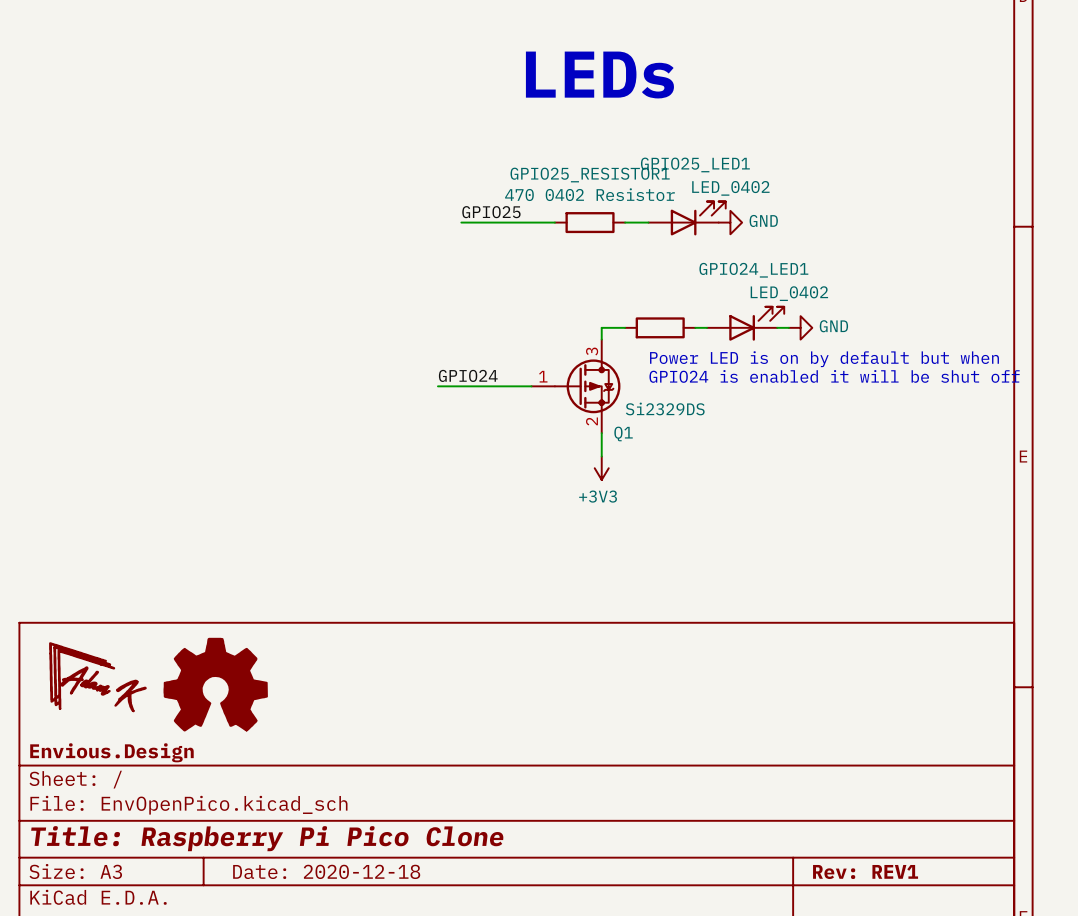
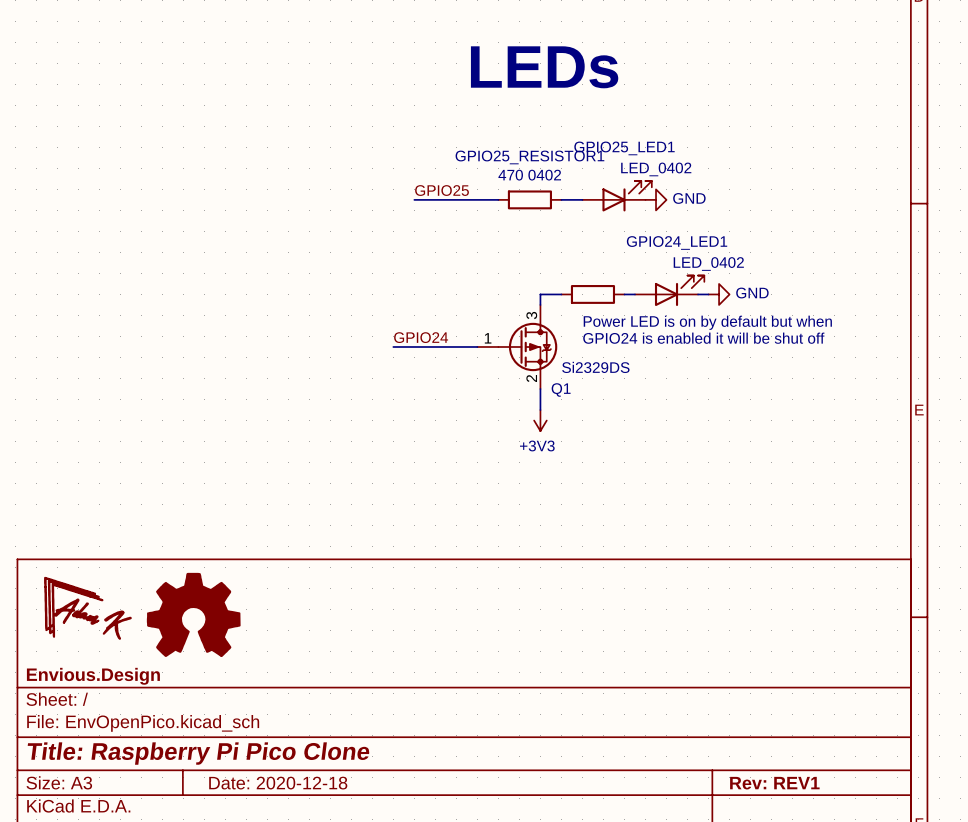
GPIO25_RESISTOR1 value: 470 0402 Resistor (589, 194) -> 470 0402 (529, 175)

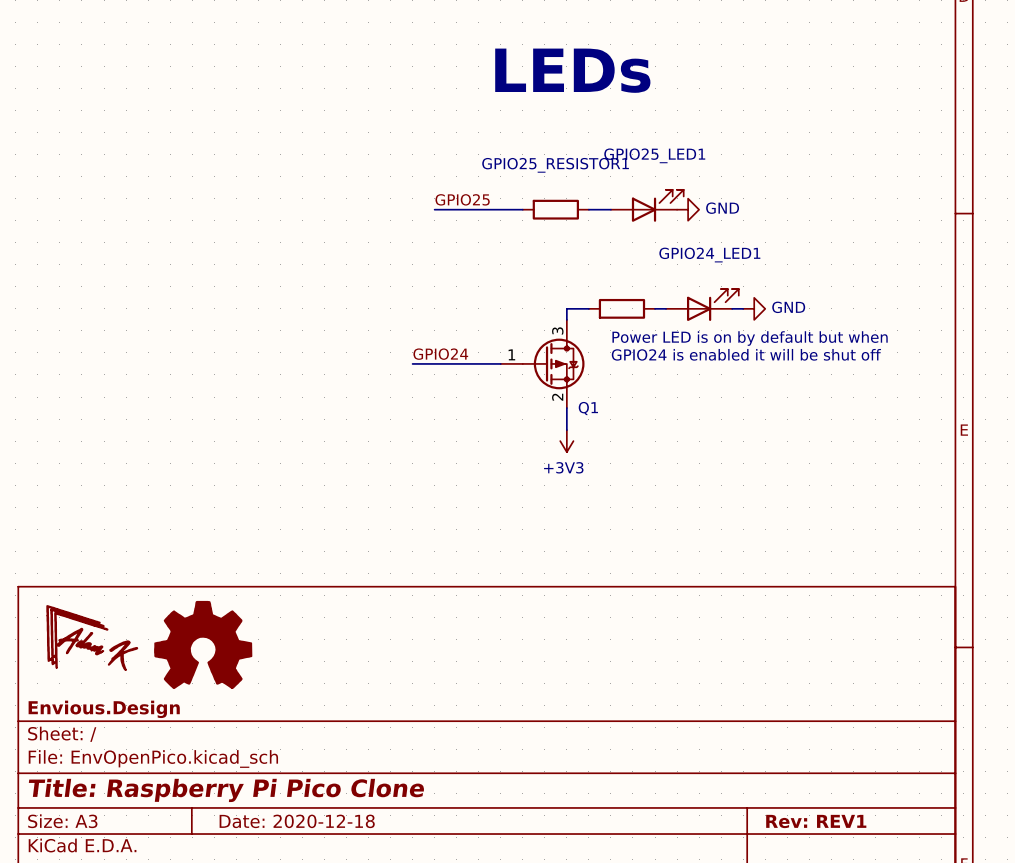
GPIO25_LED1 value: LED_0402 (656, 169) -> none
GPIO25_RESISTOR1 value: 470 0402 (529, 175) -> none
GPIO24_LED1 value: LED_0402 (708, 263) -> none
Q1 value: Si2329DS (595, 367) -> none

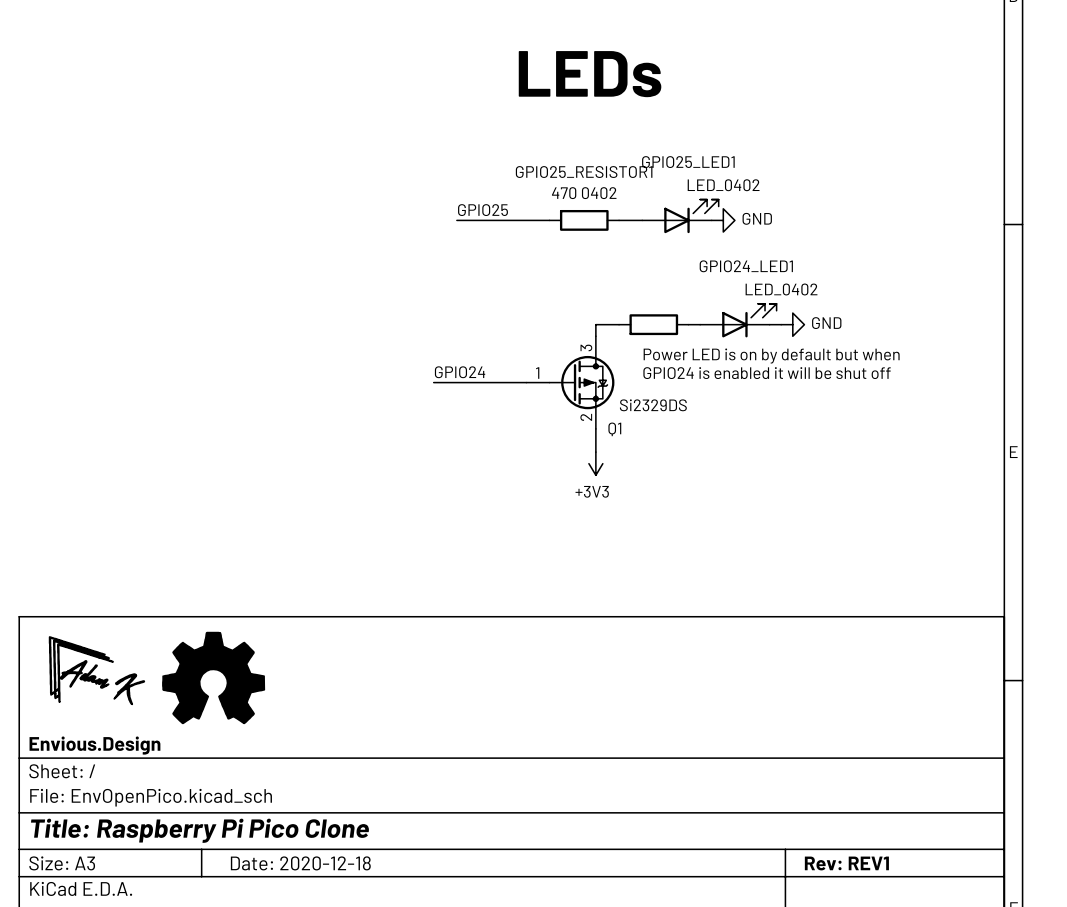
GPIO25_LED1 value: none -> LED_0402 (723, 185)
GPIO25_RESISTOR1 value: none -> 470 0402 (584, 193)
GPIO24_LED1 value: none -> LED_0402 (781, 289)
Q1 value: none -> Si2329DS (653, 405)

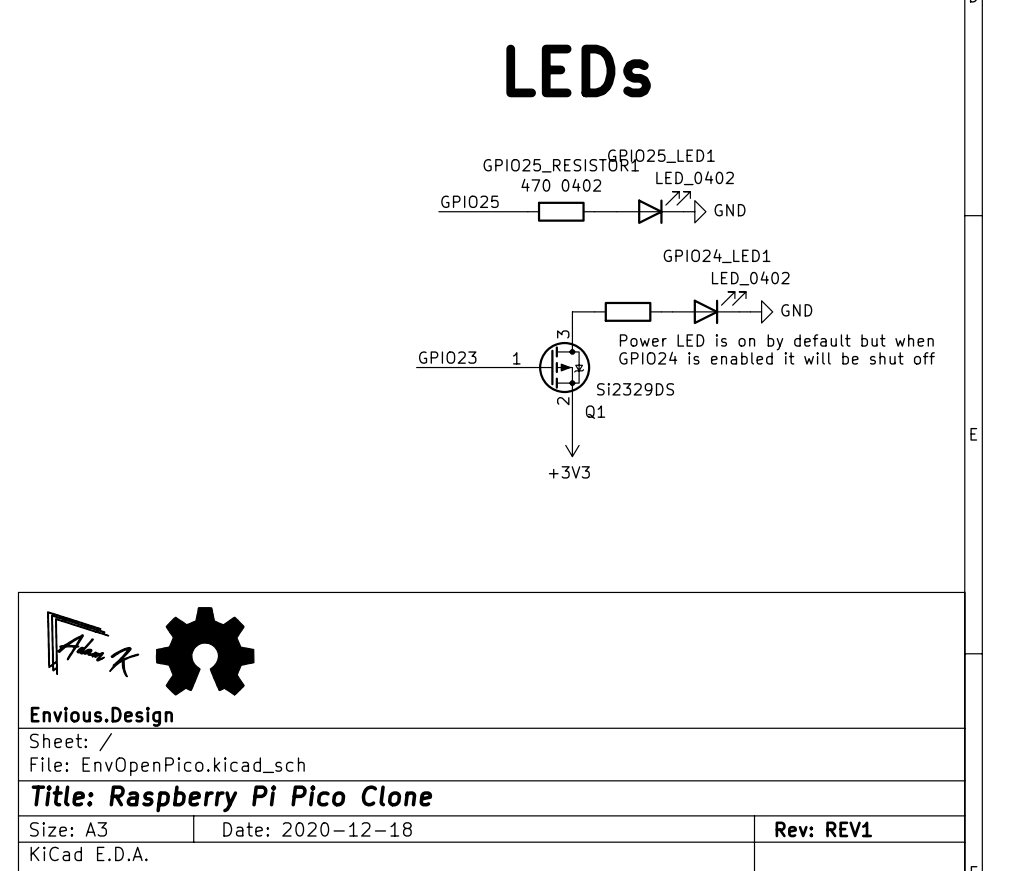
label: GPIO24 (460, 372) -> GPIO23 (447, 357)

